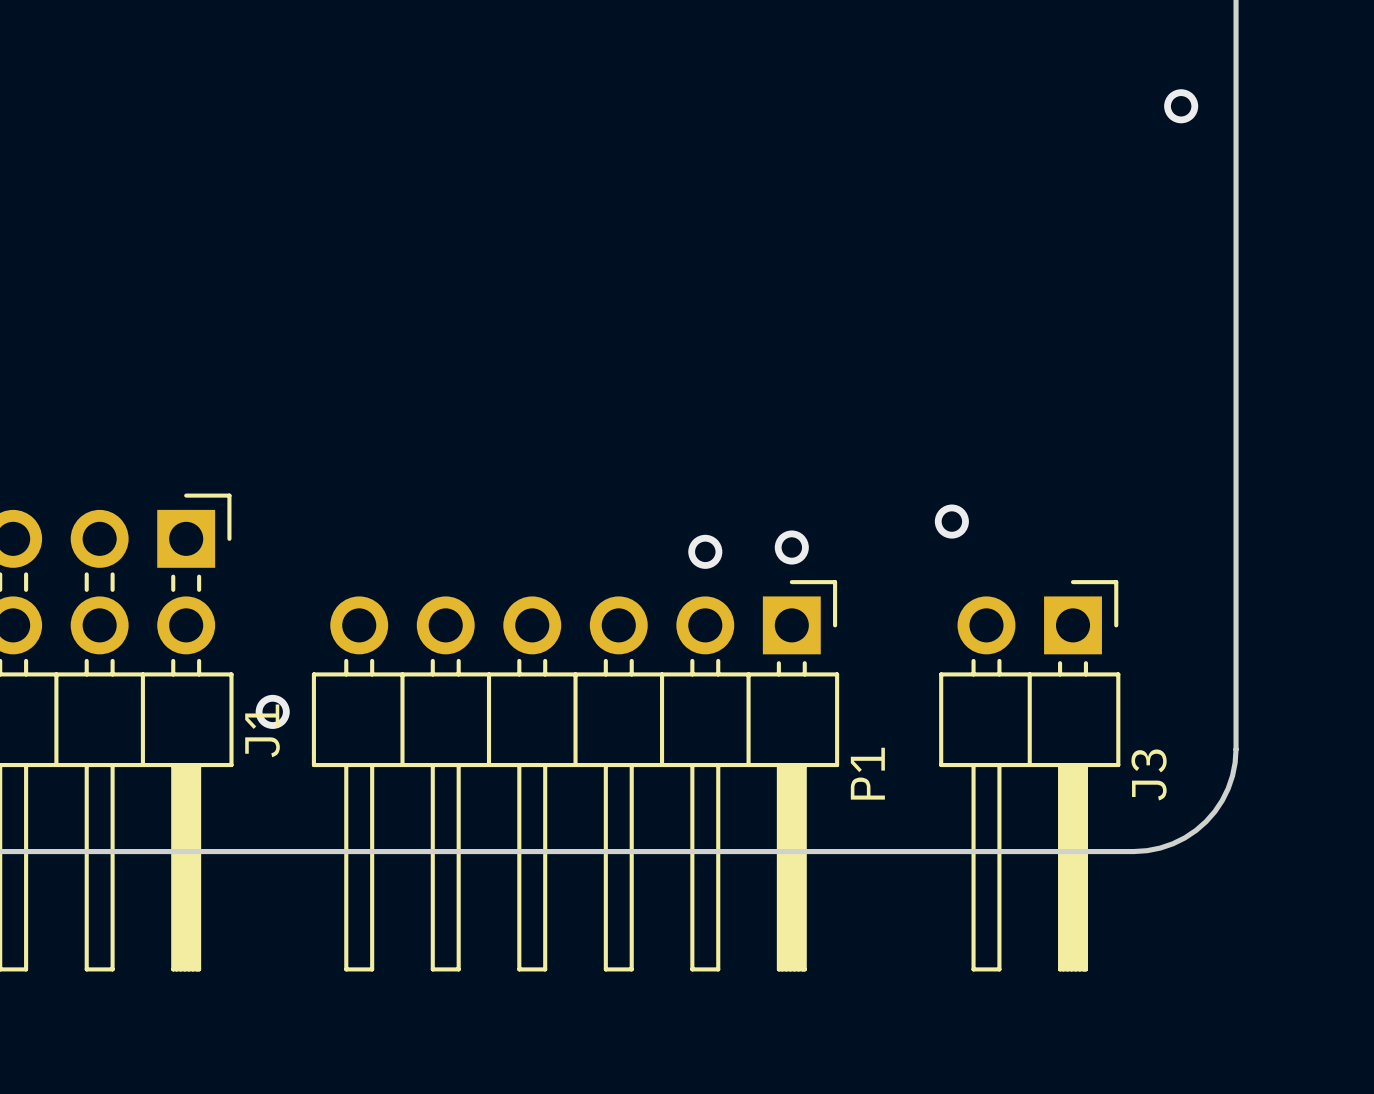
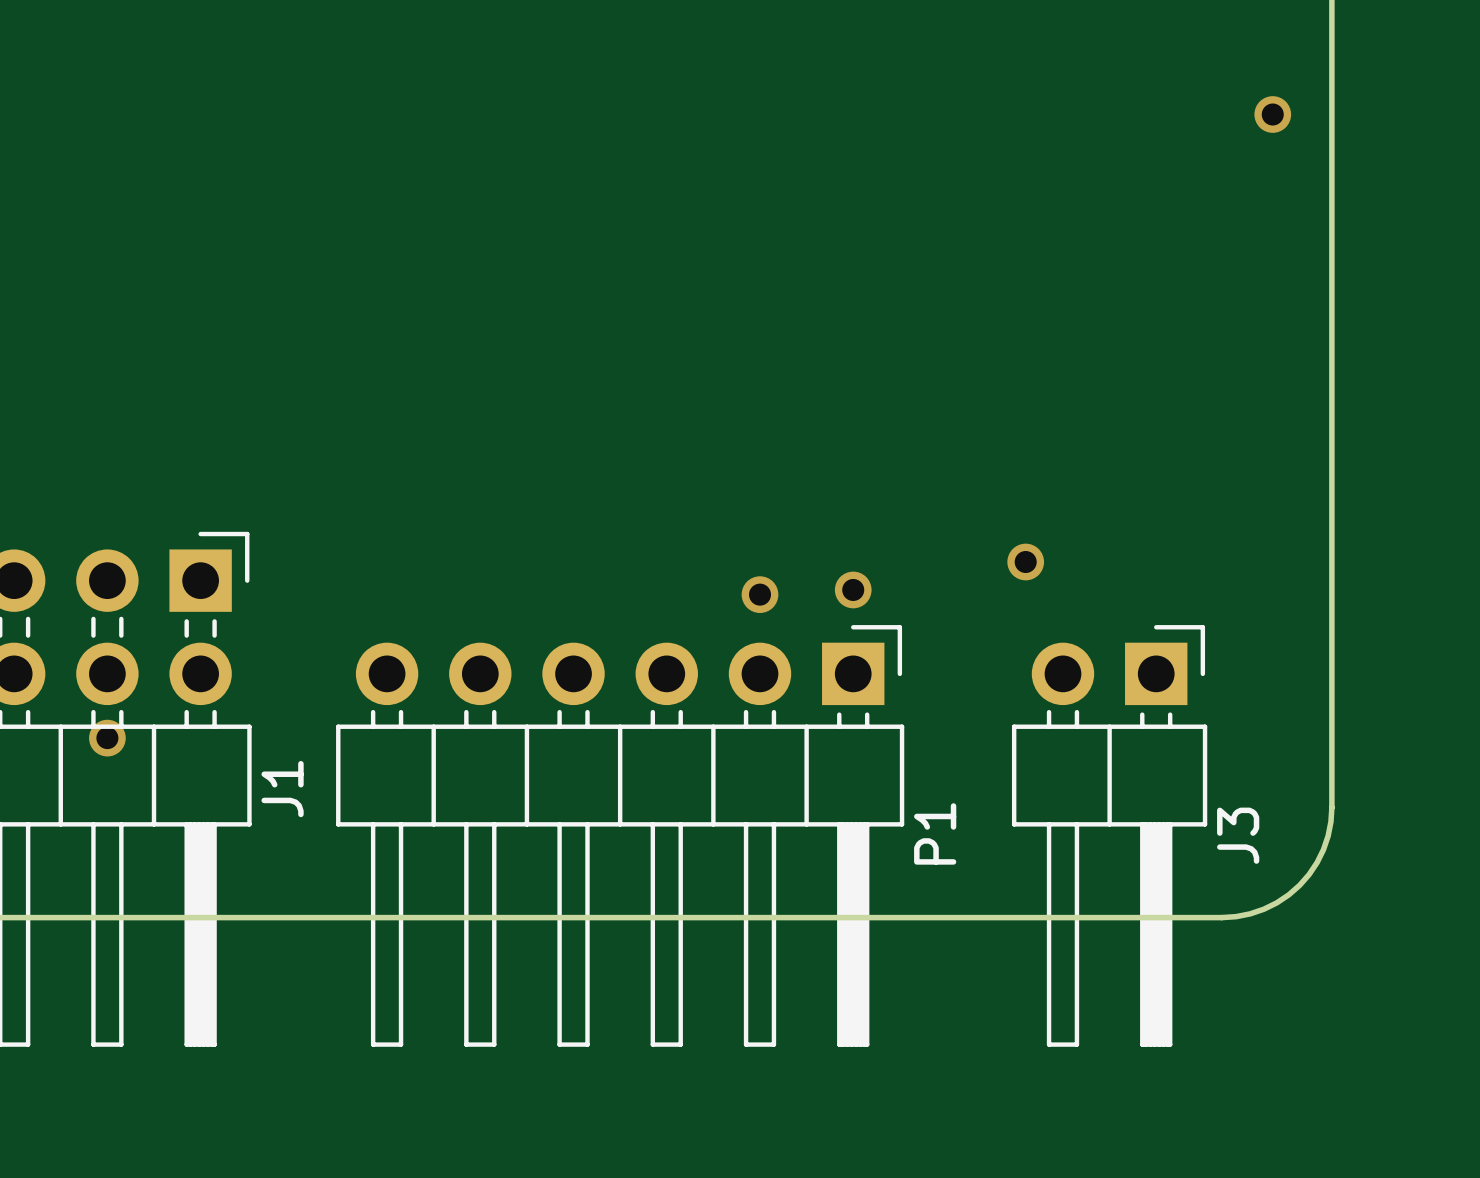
via position: (272, 711) -> (107, 738)

